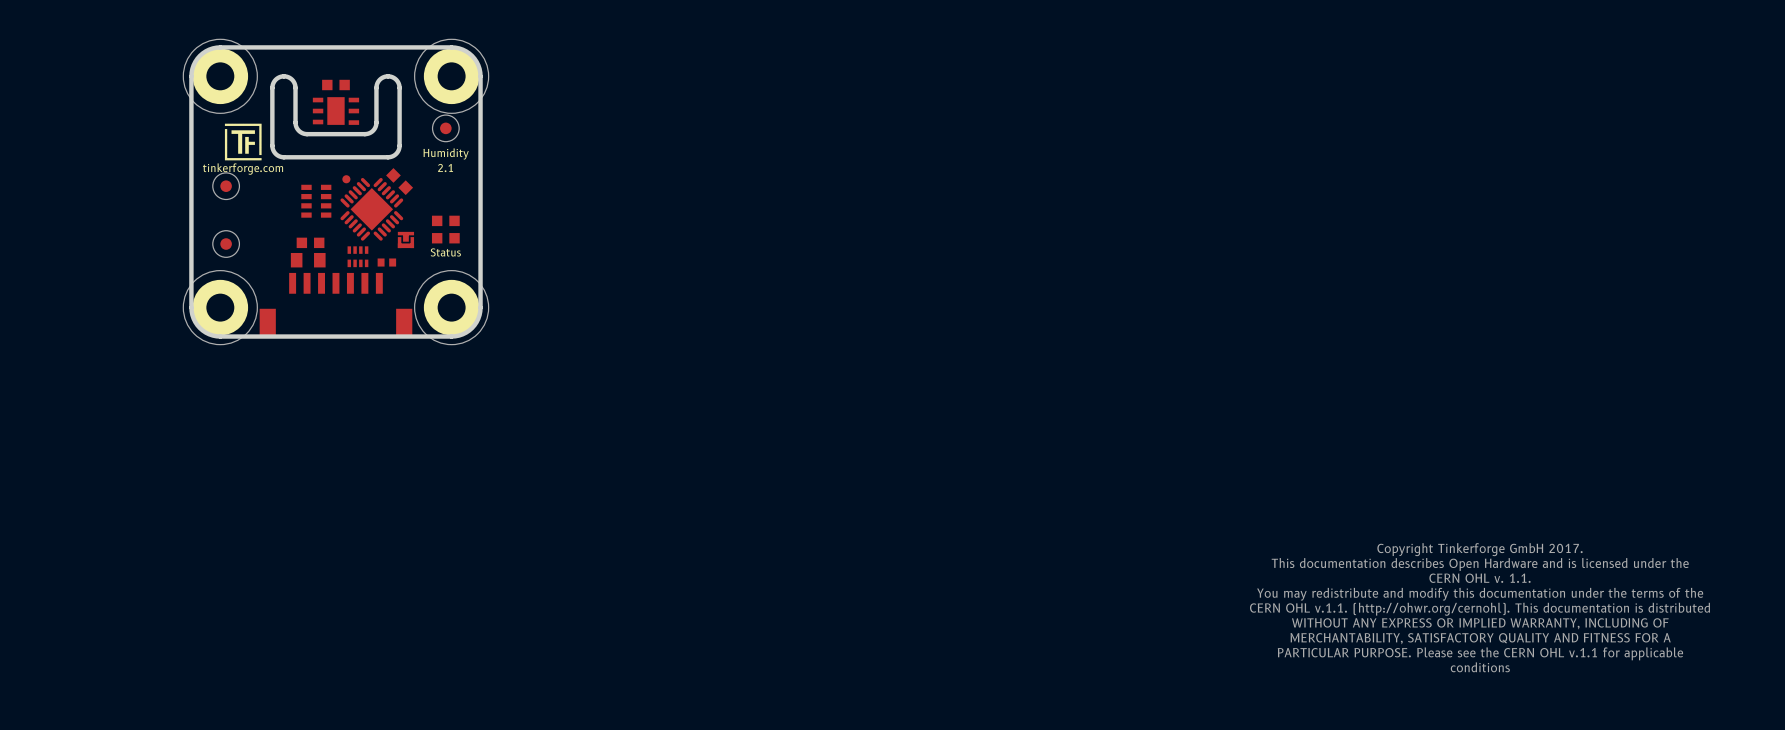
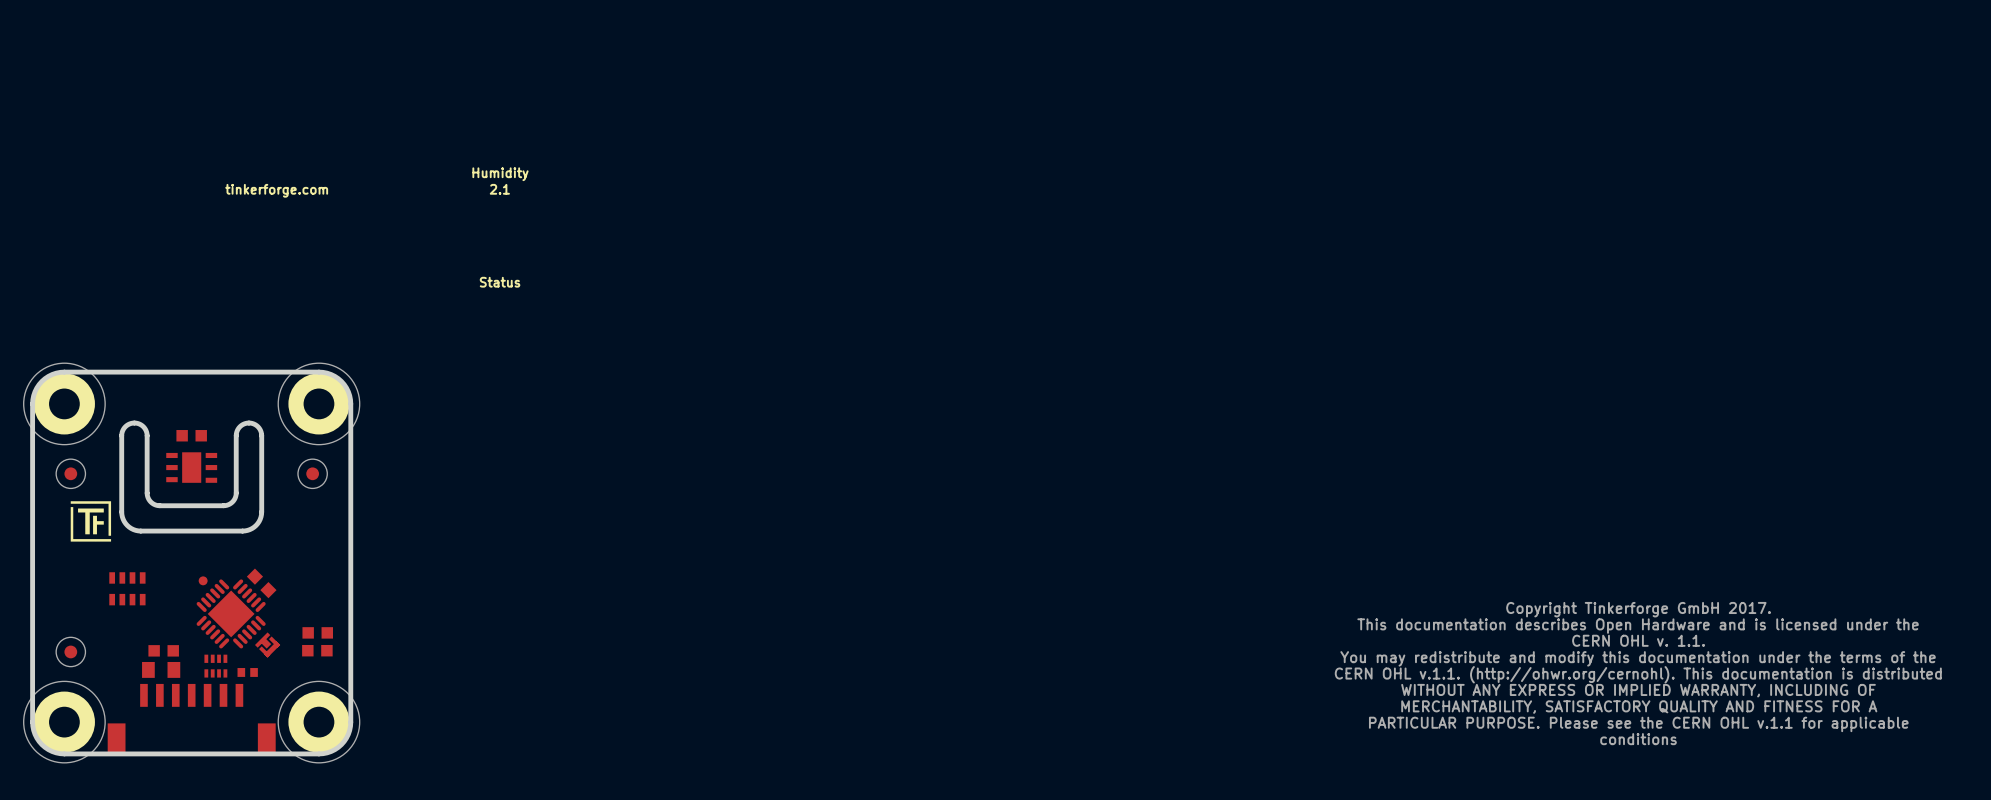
board edge: (220, 47) (451, 47) (462, 49) (472, 55) (478, 65) (480, 76) (480, 307) (478, 318) (472, 328) (462, 334) (451, 336) (220, 336) (209, 334) (199, 328) (193, 318) (191, 307) (191, 72) (195, 61) (202, 53) (220, 47) -> none
part: (220, 76) -> none
board edge: (283, 76) (290, 78) (294, 83) (295, 125) (300, 131) (307, 134) (370, 132) (376, 124) (377, 83) (383, 77) (393, 77) (398, 82) (399, 87) (398, 151) (393, 155) (388, 157) (278, 155) (272, 147) (272, 86) (275, 79) (283, 76) -> none
part: (451, 76) -> none
part: (335, 85) -> none
part: (335, 111) -> none
drawing: [224, 123, 262, 161] -> none
part: (445, 128) -> none
part: (346, 179) -> none
part: (399, 181) -> none
part: (226, 186) -> none
part: (316, 201) -> none
part: (371, 209) -> none
part: (445, 220) -> none
part: (445, 238) -> none
part: (405, 239) -> none
part: (310, 242) -> none
part: (226, 244) -> none
part: (357, 256) -> none
part: (308, 260) -> none
part: (386, 262) -> none
part: (335, 304) -> none
part position: (220, 307) -> (318, 403)
part: (451, 307) -> none
board edge: none -> (64, 372) (318, 372) (334, 376) (344, 384) (349, 395) (350, 403) (350, 722) (346, 738) (338, 747) (327, 752) (318, 753) (64, 753) (48, 749) (39, 741) (35, 734) (32, 722) (32, 399) (35, 391) (41, 381) (52, 374) (64, 372)
part: none -> (64, 403)
board edge: none -> (121, 435) (121, 514) (129, 527) (140, 531) (242, 531)
board edge: none -> (121, 435) (124, 427) (131, 423) (139, 423) (145, 429) (147, 435) (147, 494) (152, 503) (159, 505) (223, 505) (231, 503) (236, 494) (237, 430) (242, 424) (250, 423) (259, 427) (261, 435)
part: none -> (191, 435)
board edge: none -> (261, 435) (261, 511)
part: none -> (191, 467)
part: none -> (70, 473)
part: none -> (312, 473)
drawing: none -> [70, 501, 112, 542]
board edge: none -> (261, 511) (256, 525) (242, 531)
part: none -> (203, 580)
part: none -> (261, 583)
part: none -> (127, 588)
part: none -> (231, 613)
part: none -> (317, 632)
part: none -> (267, 645)
part: none -> (163, 650)
part: none -> (317, 650)
part: none -> (70, 651)
part: none -> (215, 666)
part: none -> (161, 669)
part: none -> (247, 672)
part: none -> (191, 718)
part: none -> (64, 722)
part: none -> (318, 722)

